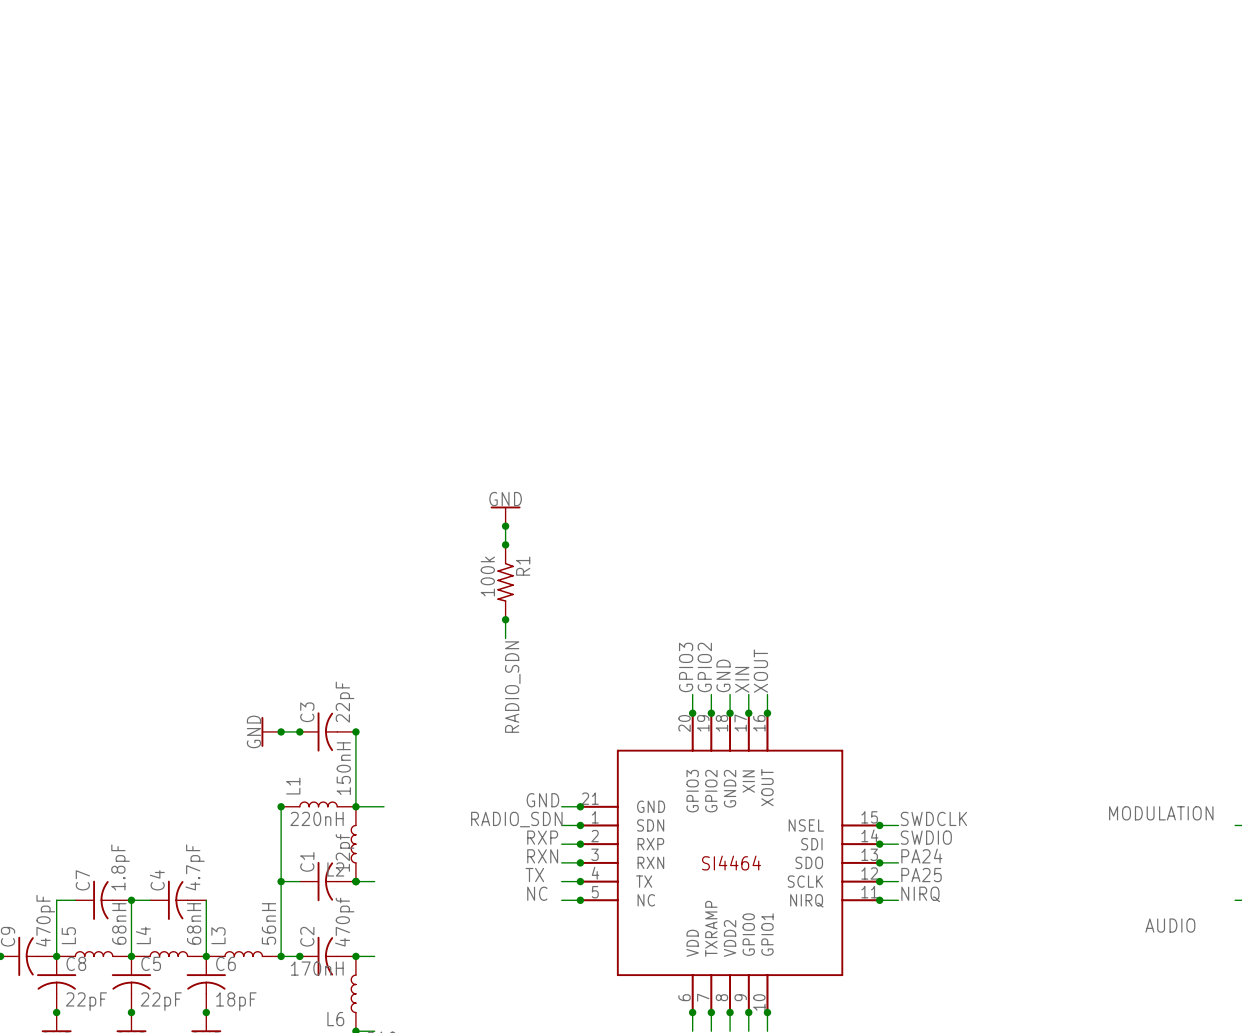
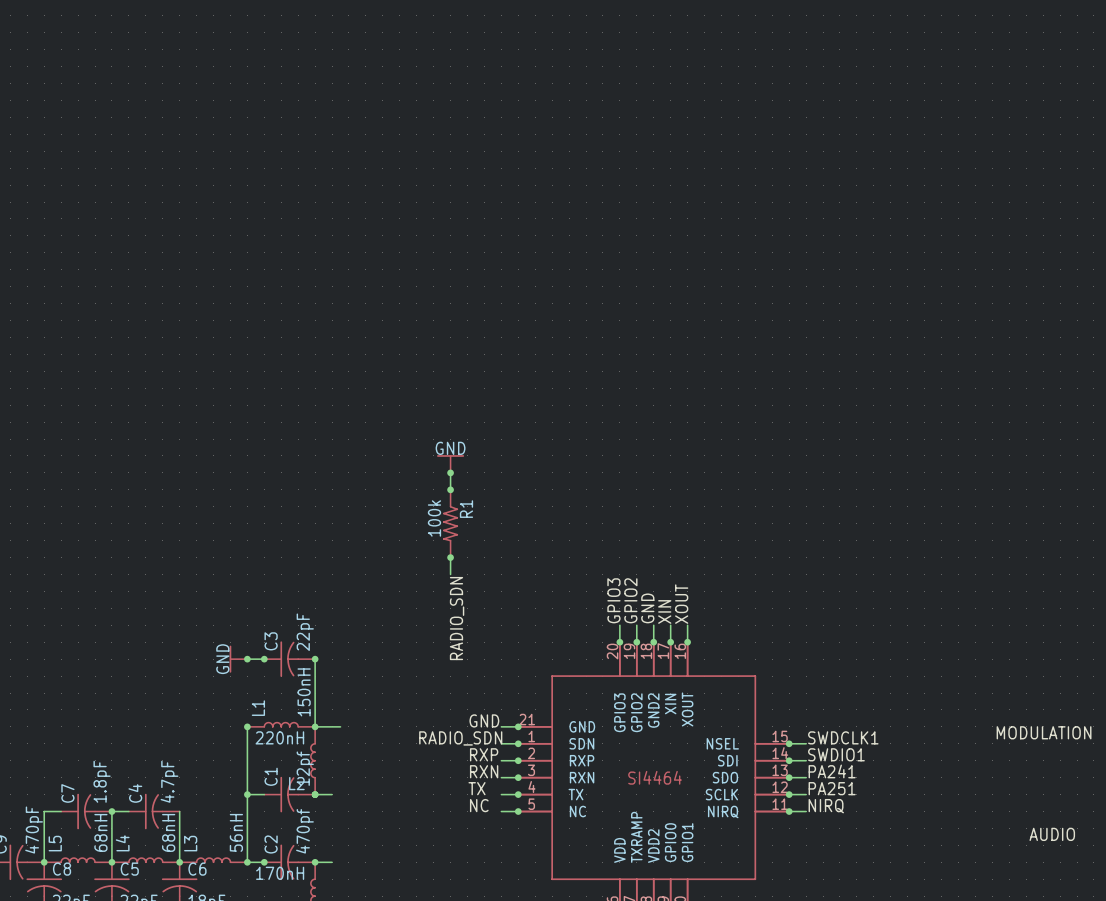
label: SWDCLK (933, 818) -> SWDCLK1 (843, 737)
label: SWDIO (926, 837) -> SWDIO1 (836, 754)
label: PA24 (921, 856) -> PA241 (832, 771)
label: PA25 (921, 875) -> PA251 (832, 788)

